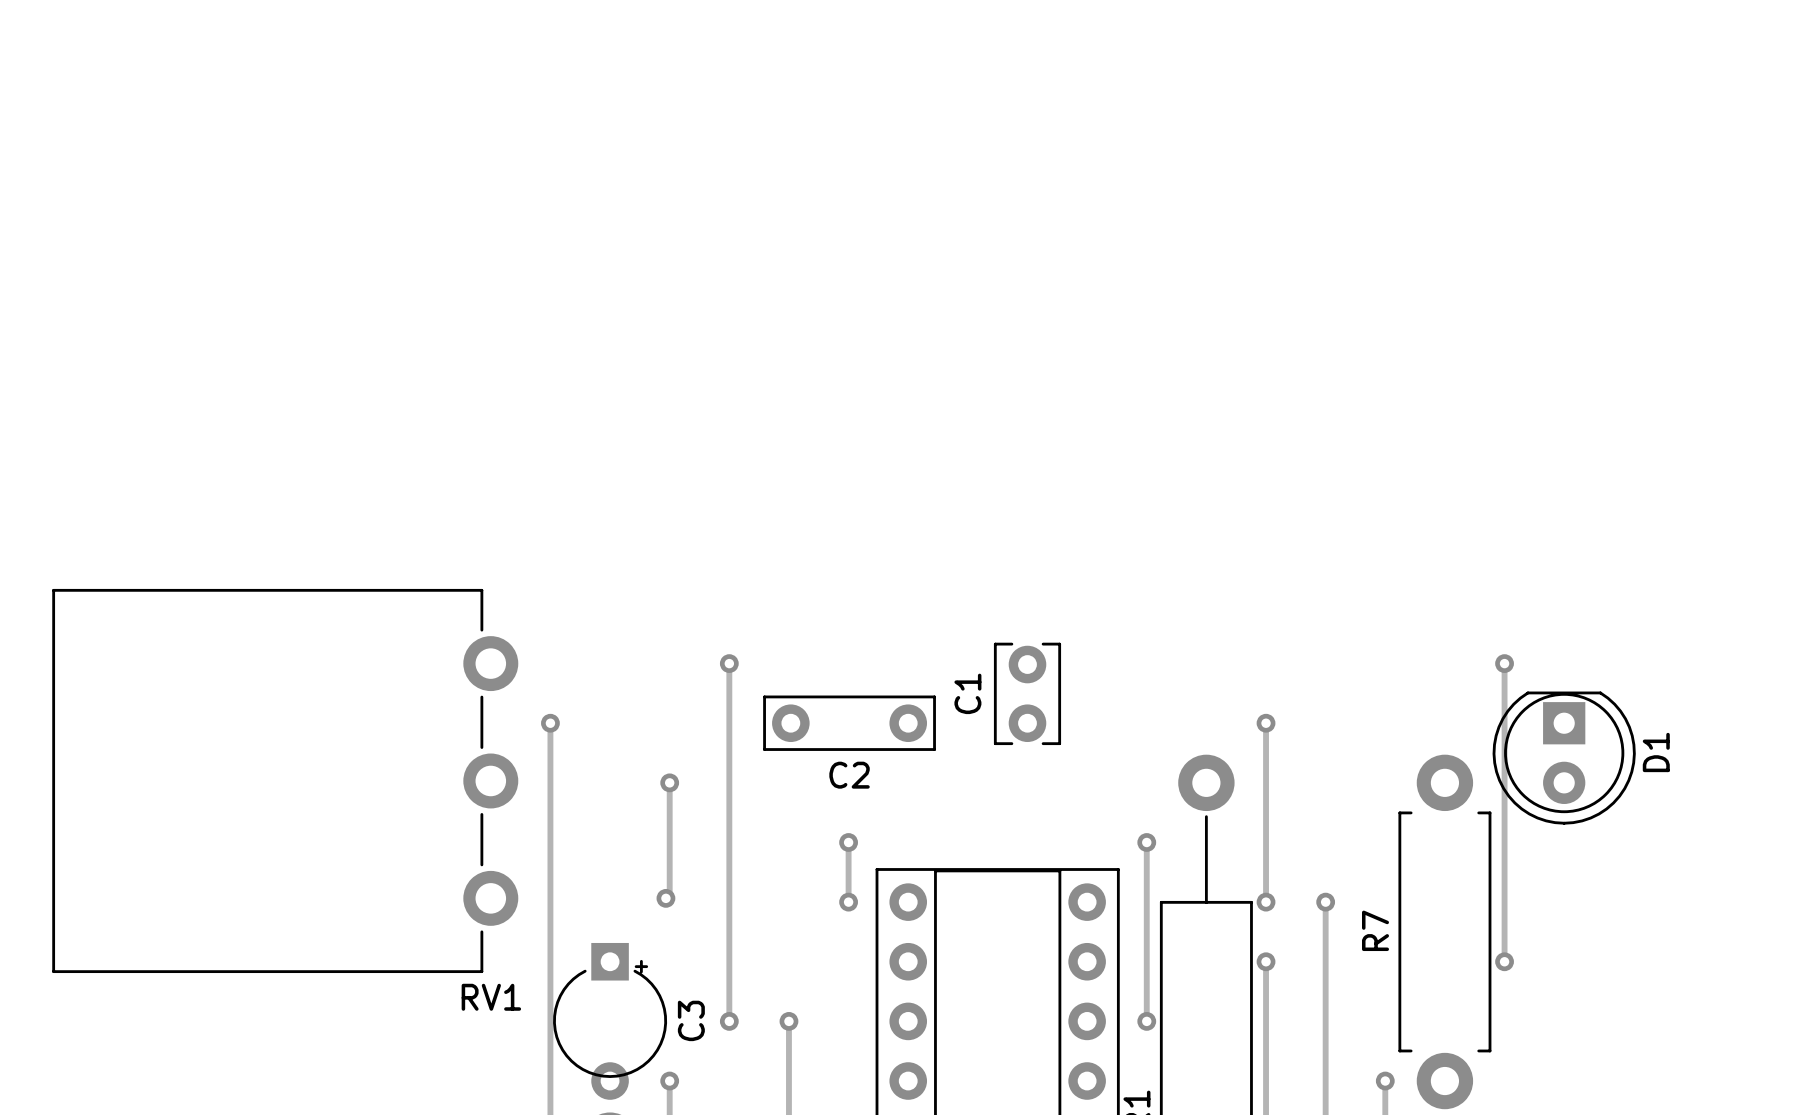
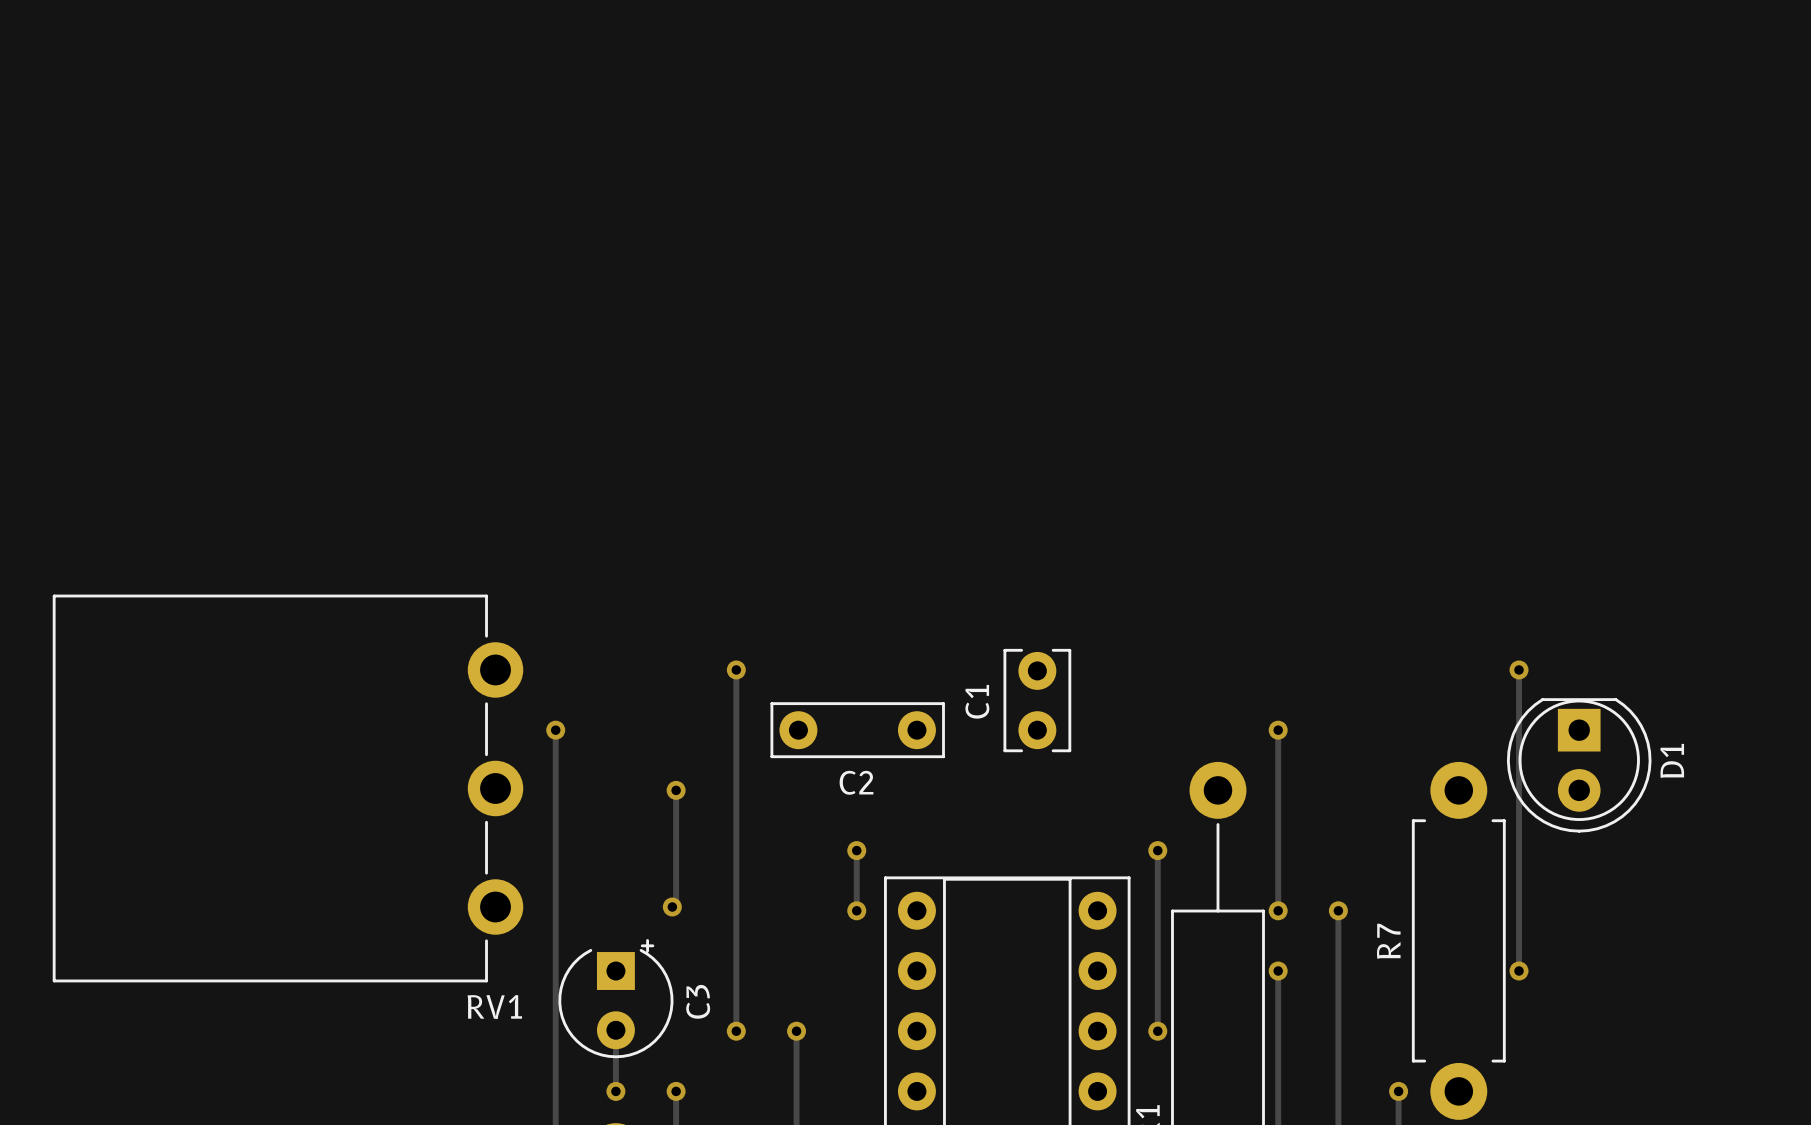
C3 footprint: [553, 942, 668, 1100] -> [558, 939, 674, 1059]
track: none -> (615, 1030) (615, 1091)
via: none -> (615, 1091)

